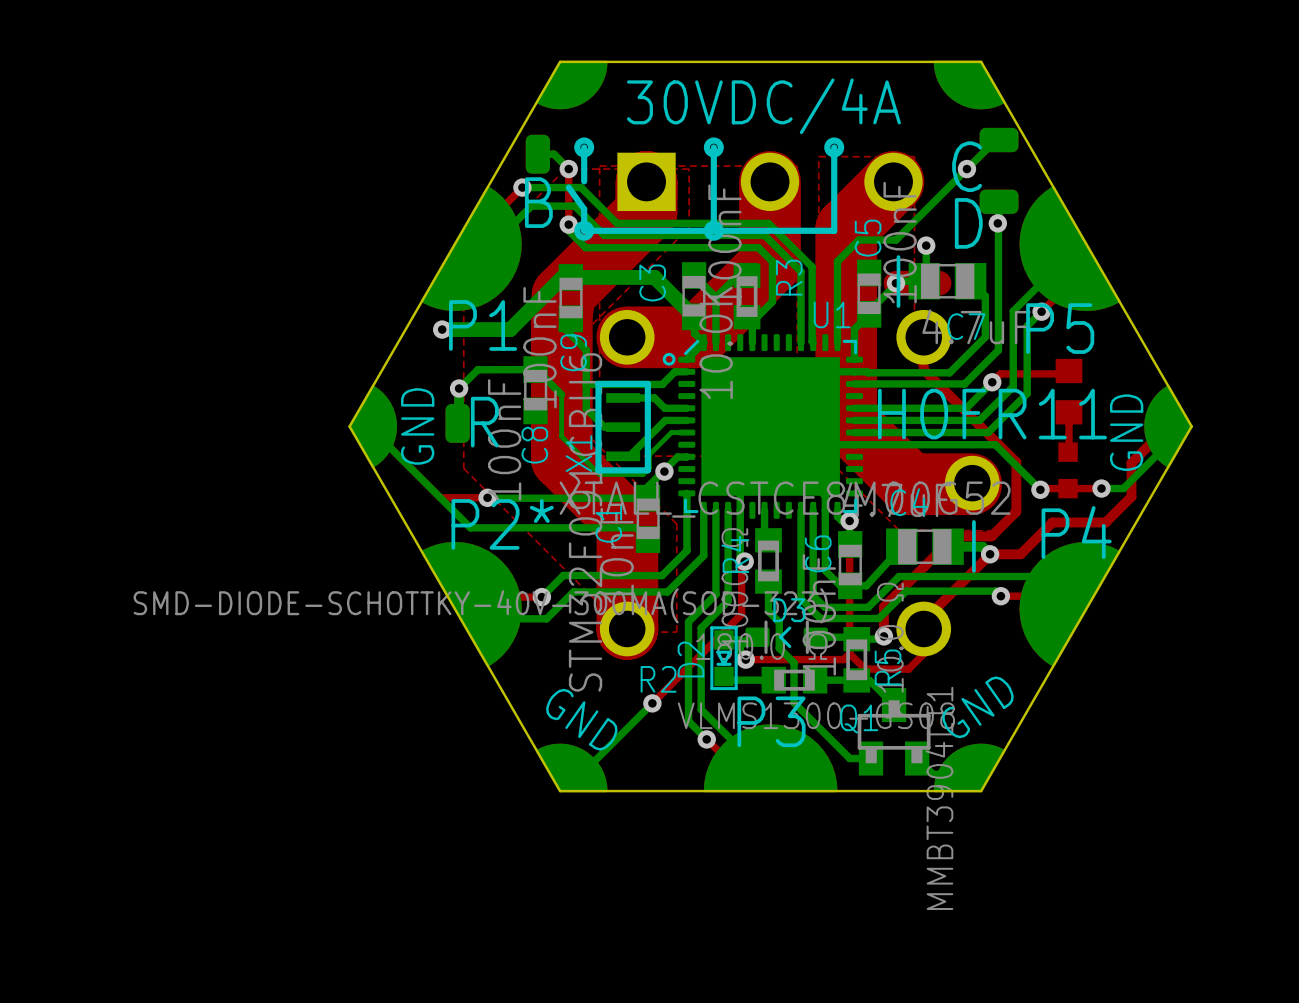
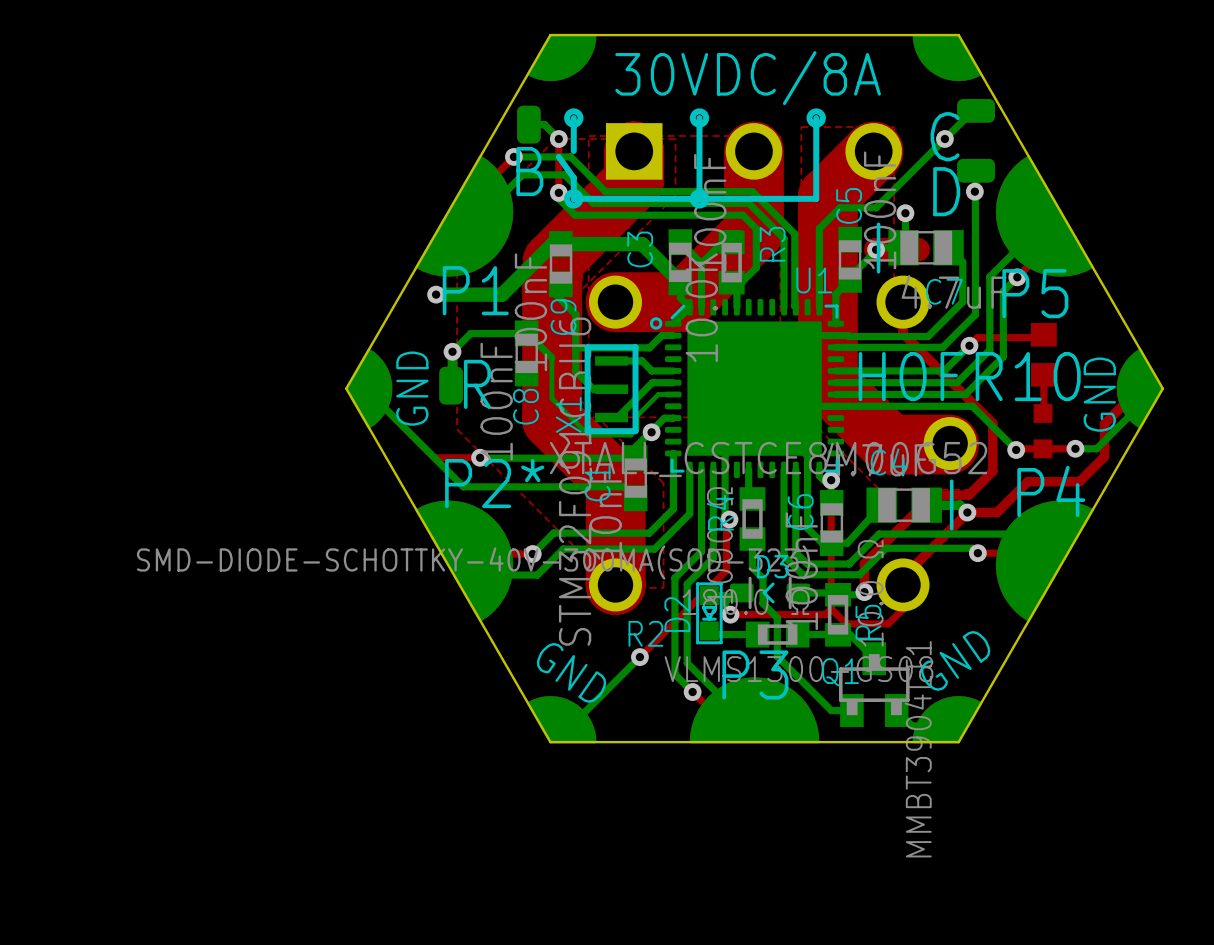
text: 30VDC/4A (763, 106) -> 30VDC/8A (748, 78)
text: H0FR11 (992, 414) -> H0FR10 (969, 376)

